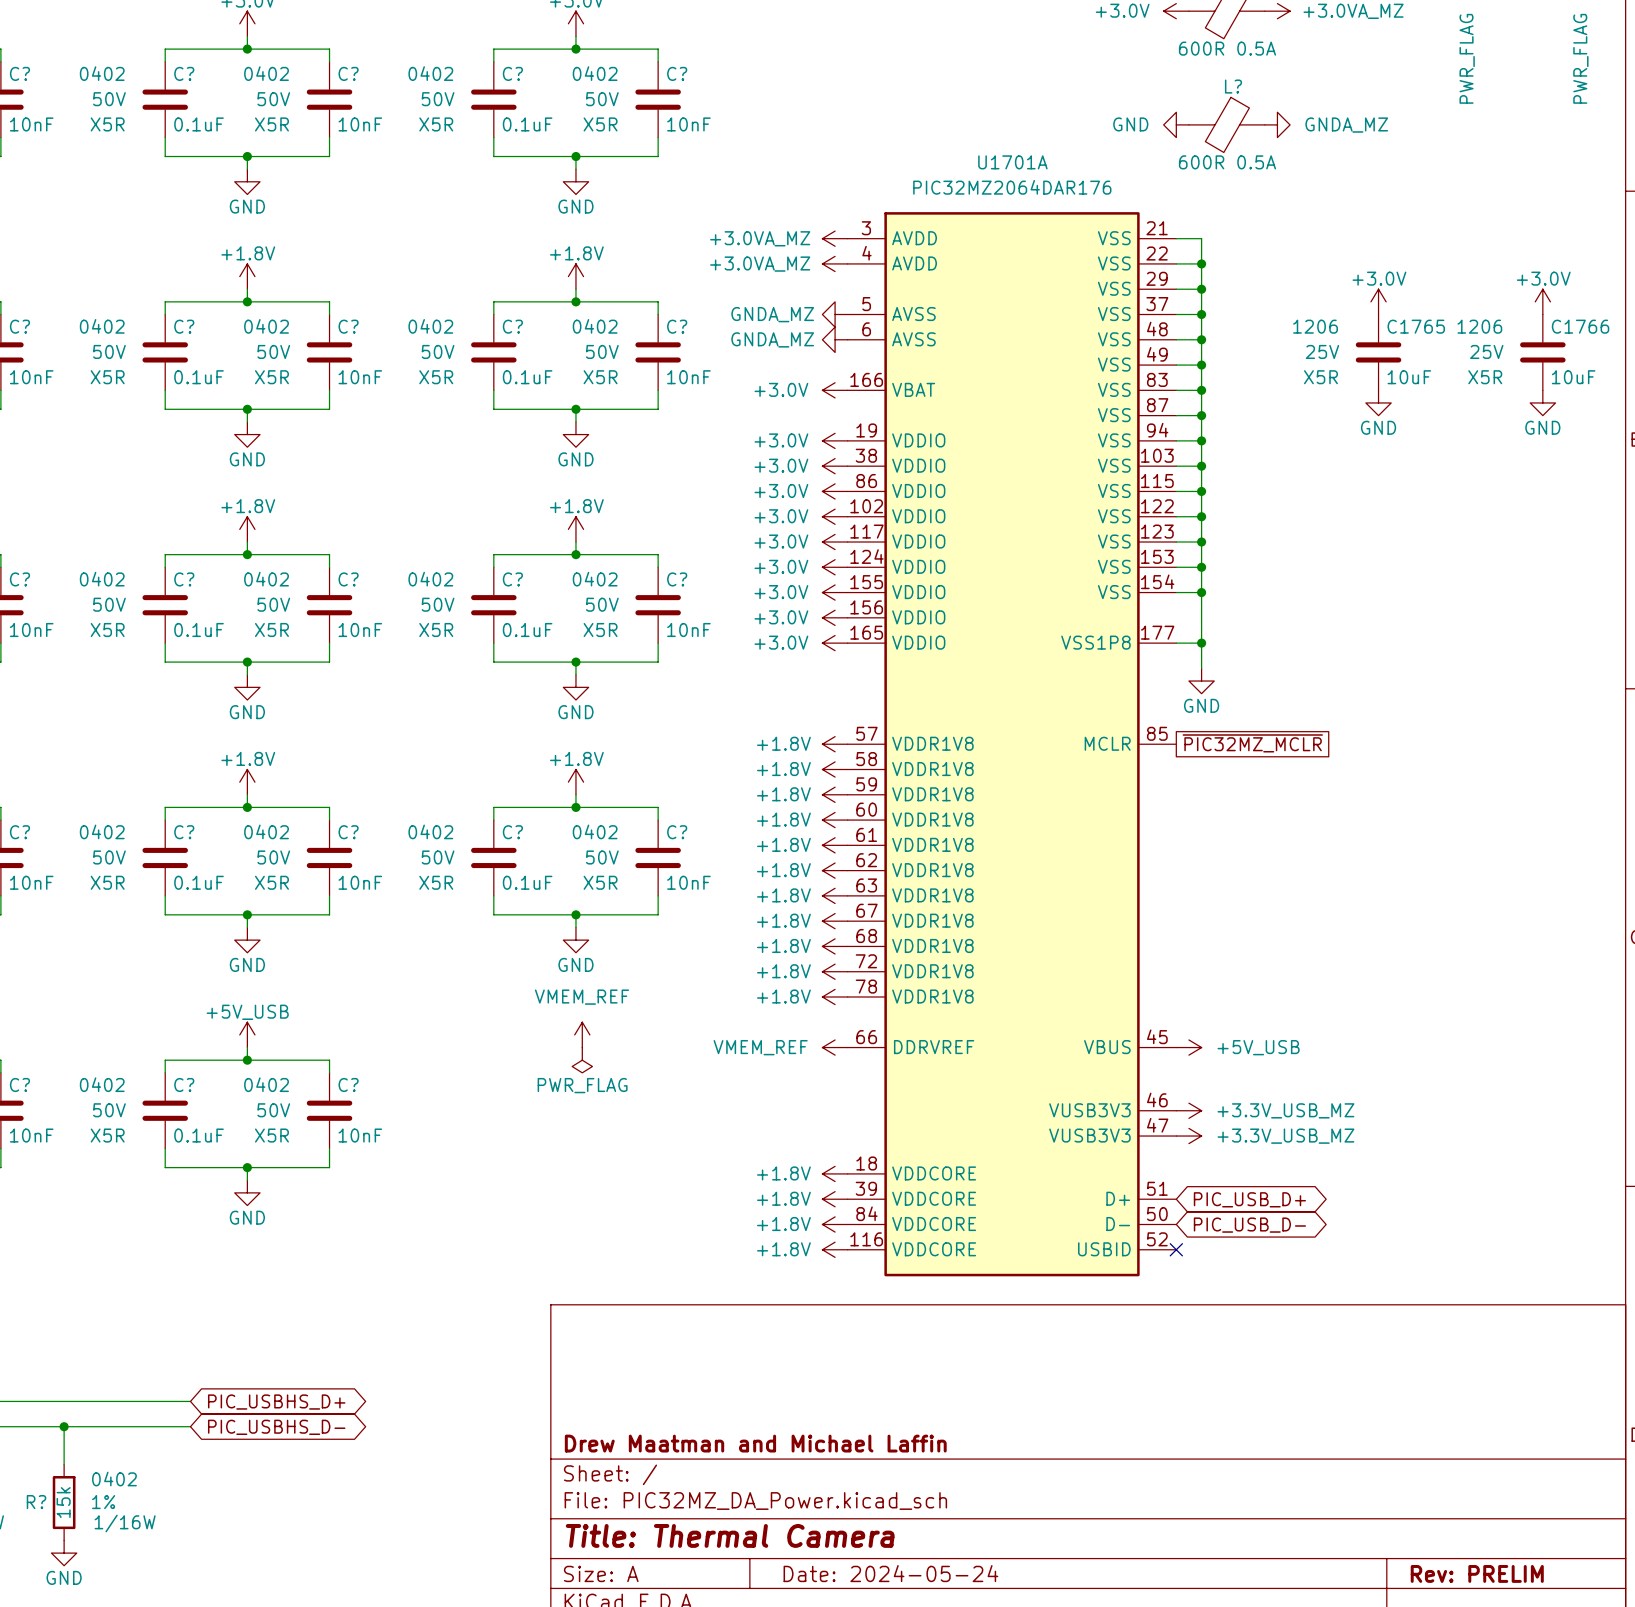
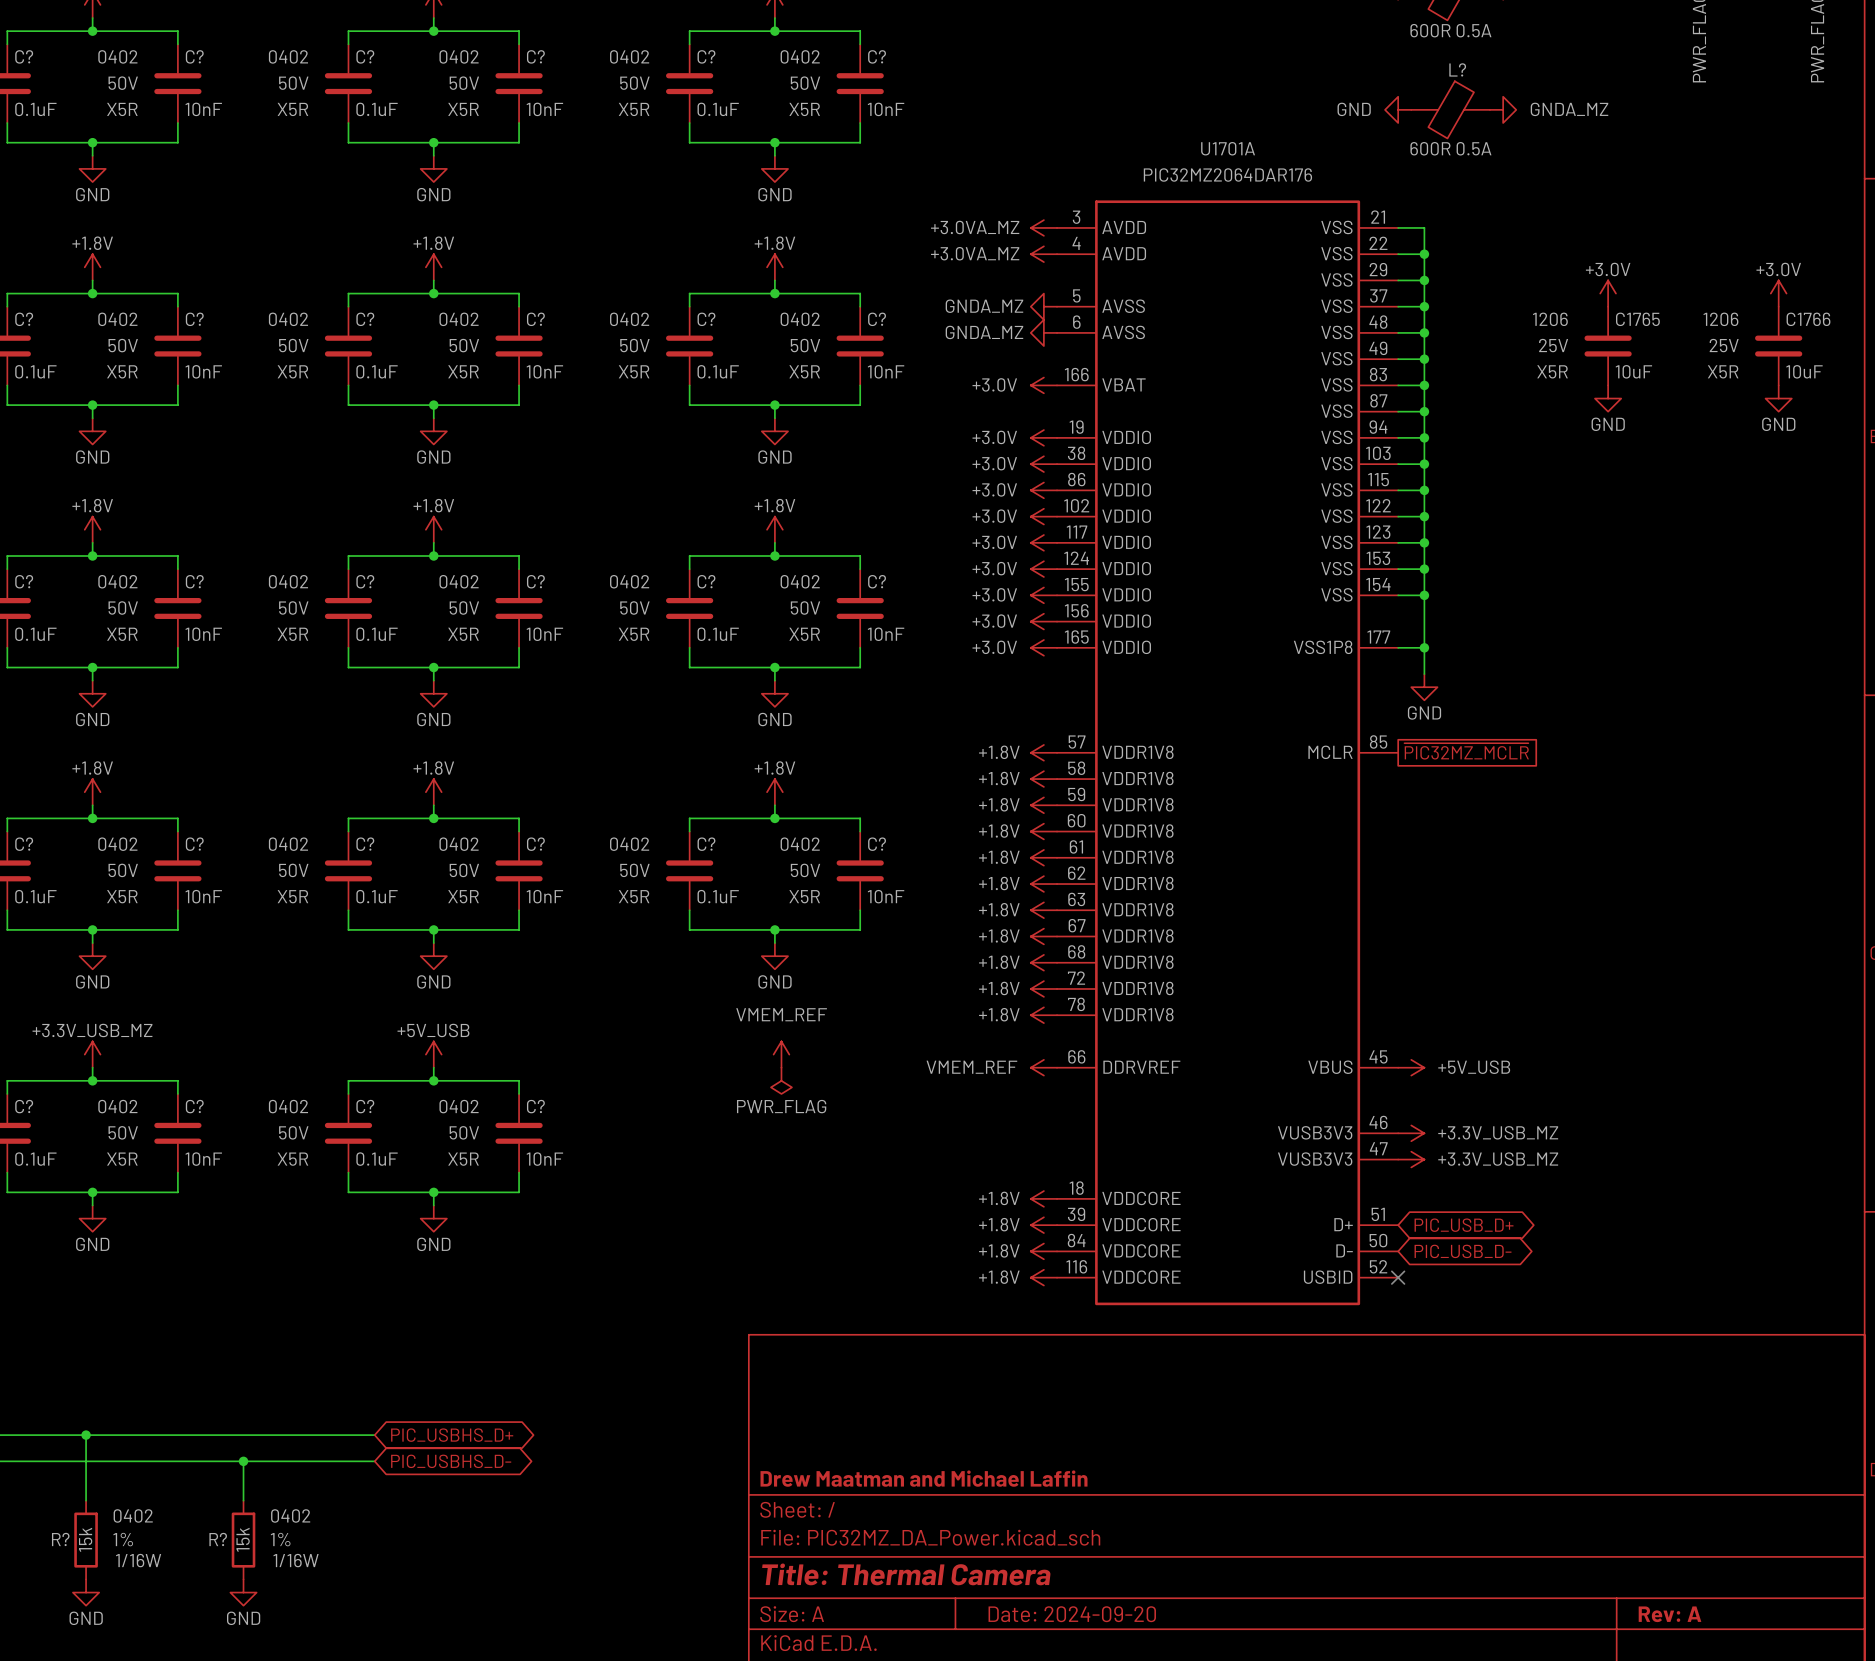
title block: Date: 2024-05-24 (890, 1573) -> Date: 2024-09-20 (1072, 1614)
title block: Rev: PRELIM (1477, 1573) -> Rev: A (1669, 1614)

